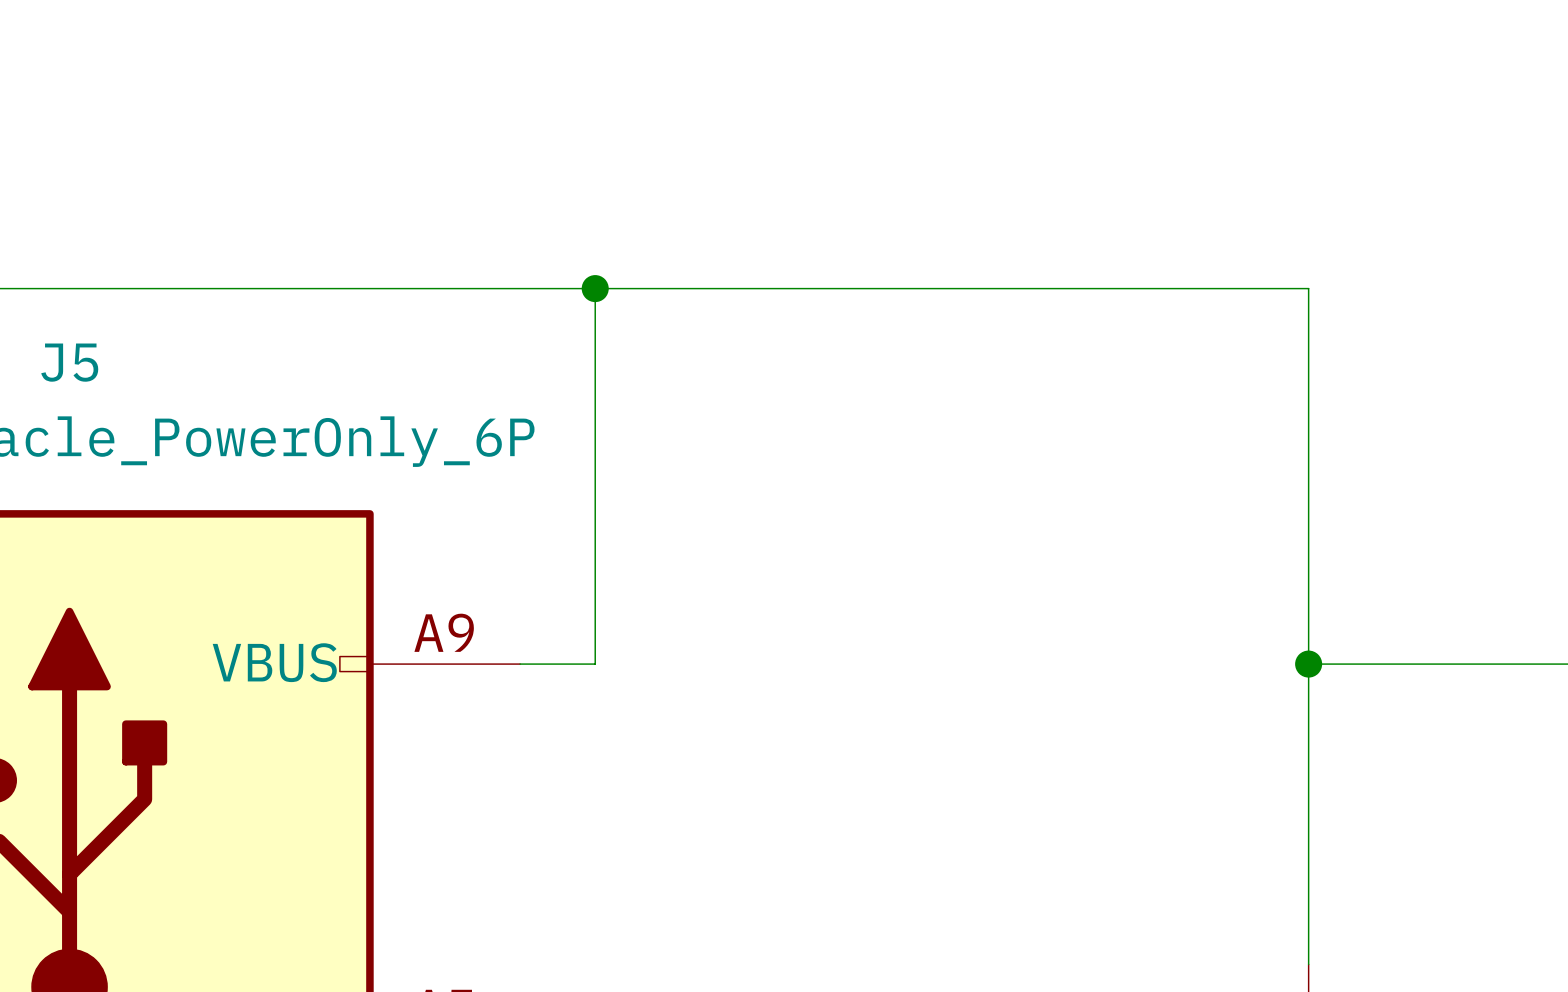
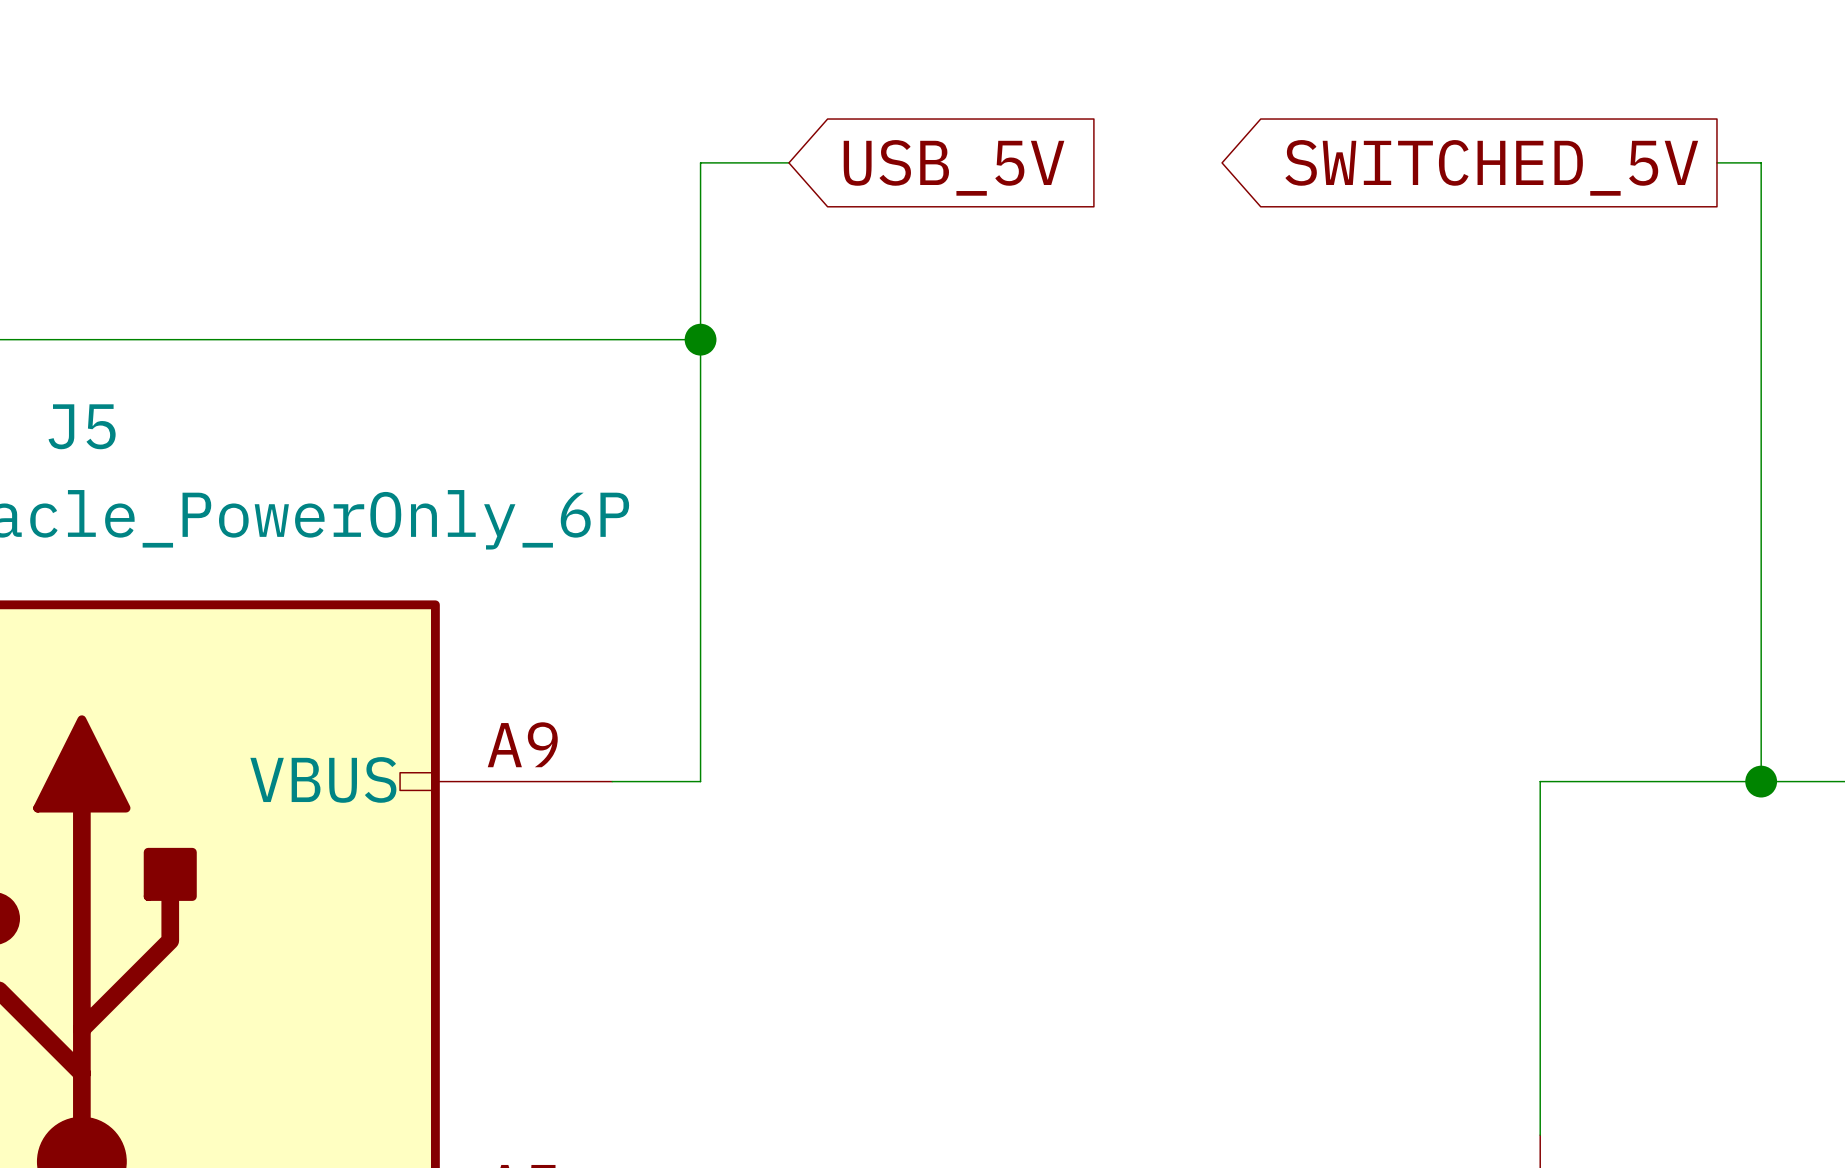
wire: none -> (1716, 162) (1761, 162) (1761, 781)
global label: none -> USB_5V (954, 167)
global label: none -> SWITCHED_5V (1491, 167)
wire: (595, 288) (1308, 288) (1308, 664) -> (700, 339) (700, 162) (788, 162)
junction: (1308, 664) -> none
junction: none -> (1761, 781)

